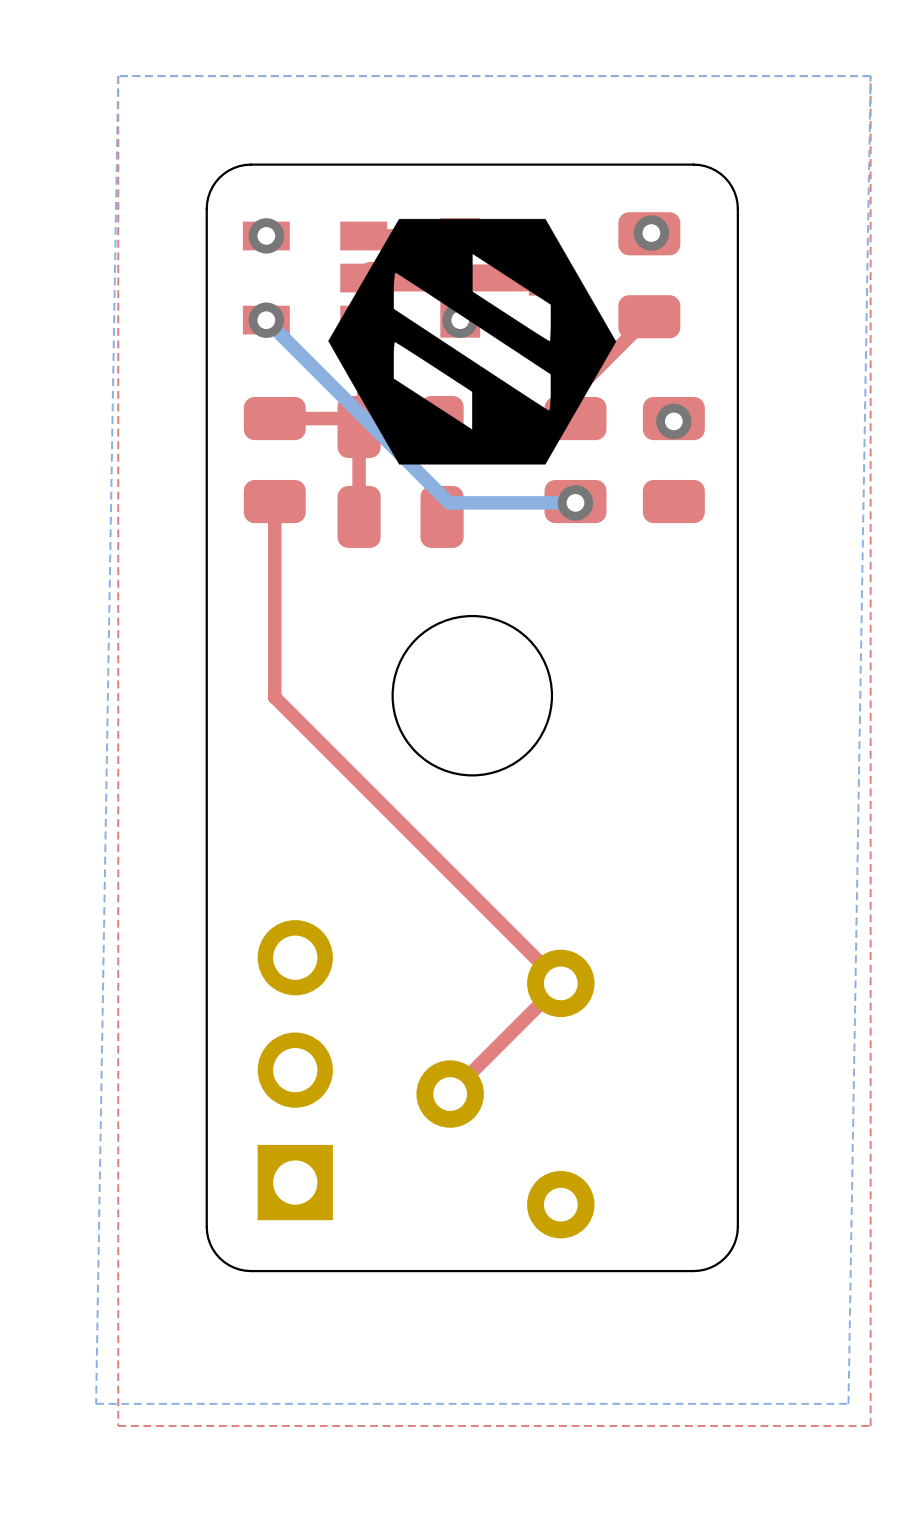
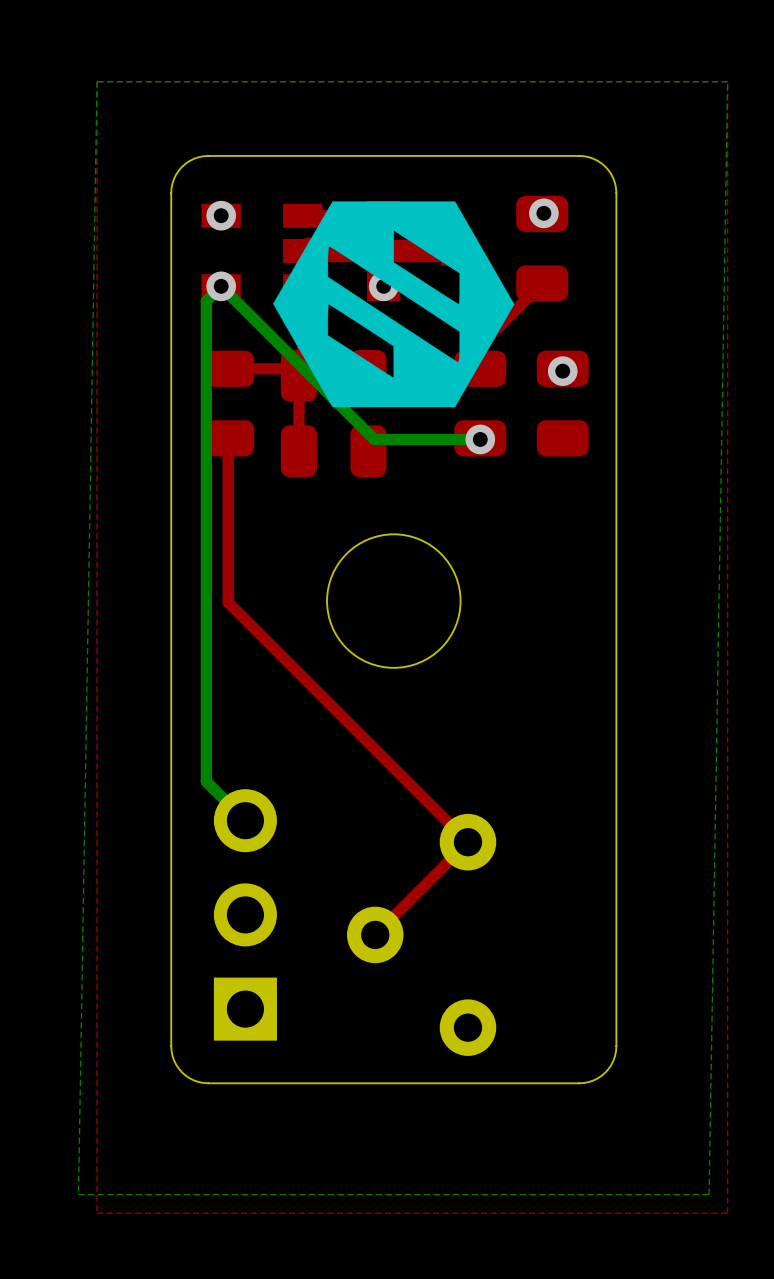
bottom track: none -> (221, 286) (206, 301) (206, 781) (245, 820)

